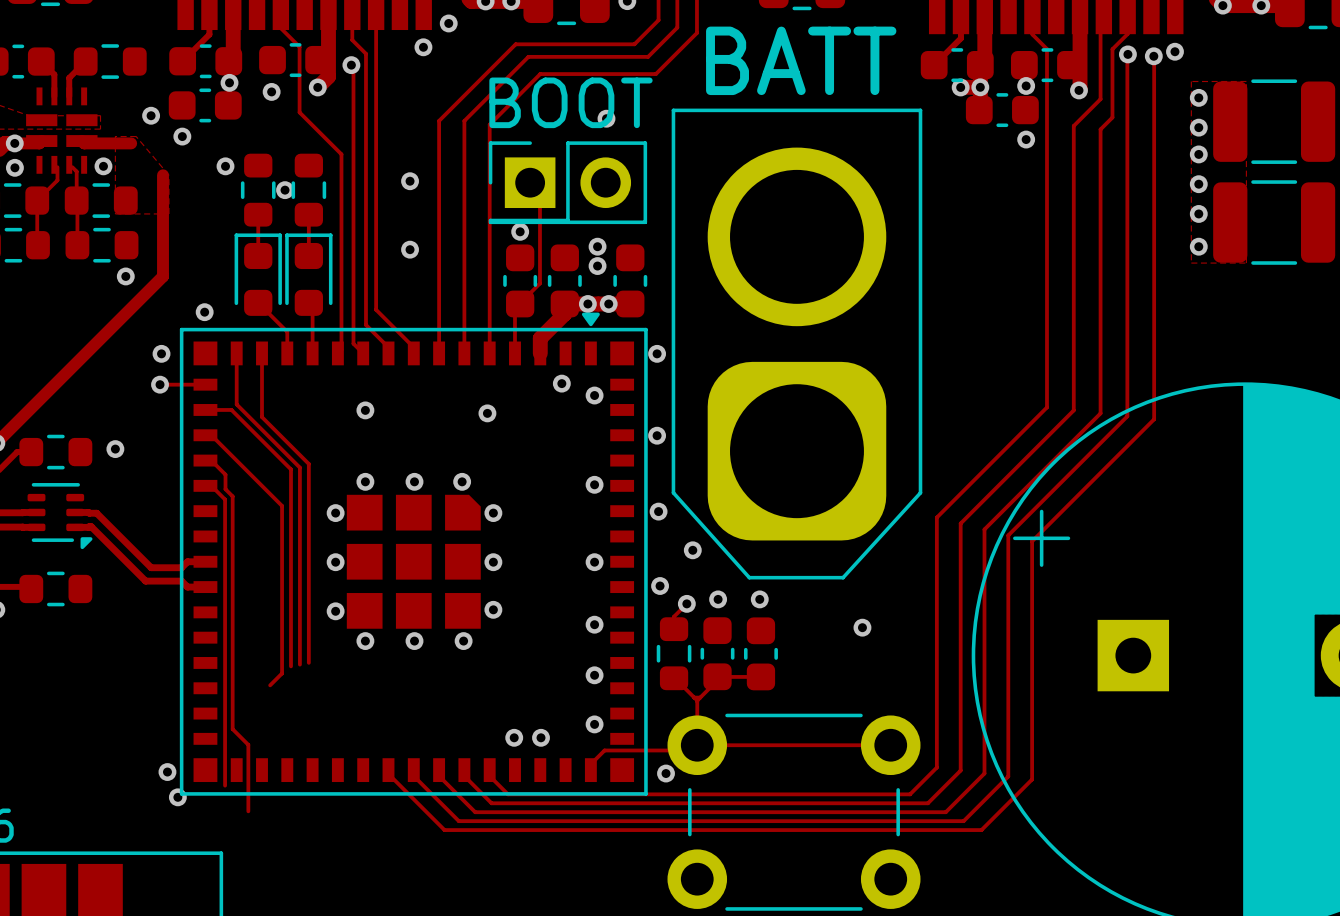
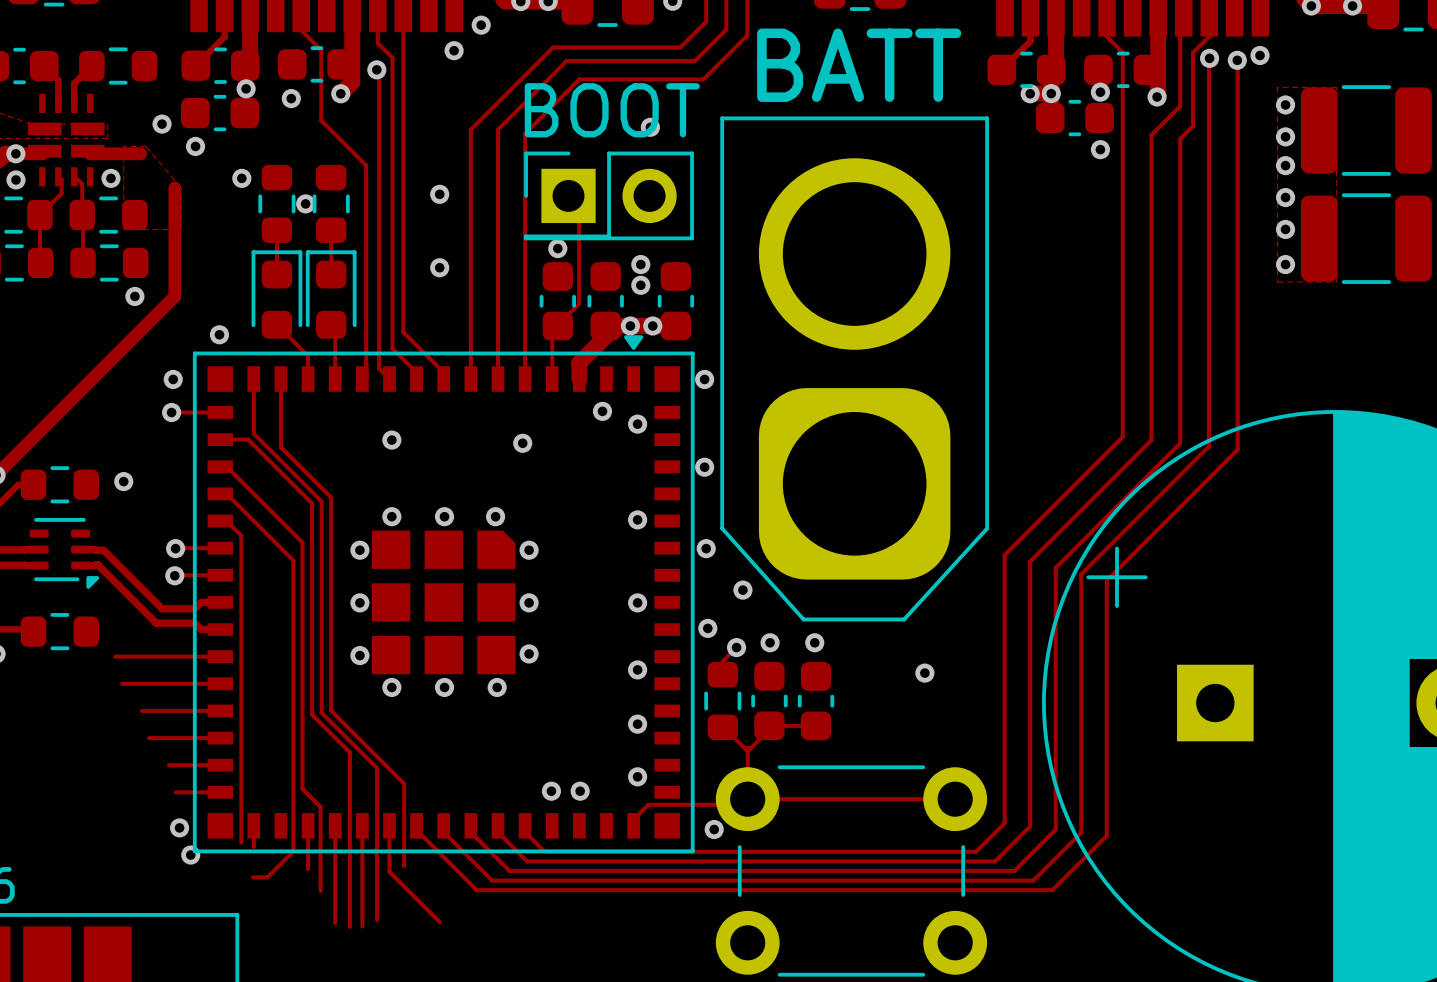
track: (225, 474) (225, 489) (232, 496) (232, 729) (248, 744) (248, 811) -> (241, 509) (293, 560) (293, 851) (267, 877) (252, 877)
via: none -> (175, 548)
track: none -> (220, 548) (175, 548)
via: none -> (174, 575)
track: none -> (220, 575) (174, 575)
track: none -> (115, 656) (220, 656)
track: none -> (122, 683) (220, 683)
track: none -> (142, 710) (220, 710)
track: none -> (331, 710) (404, 783) (404, 866)
track: none -> (321, 712) (377, 768) (377, 920)
track: none -> (312, 714) (349, 752) (349, 926)
track: (282, 673) (270, 685) -> (302, 722) (302, 788) (320, 807) (320, 890)
track: none -> (149, 738) (220, 738)
track: none -> (168, 765) (220, 765)
track: none -> (175, 792) (220, 792)
track: none -> (253, 825) (253, 847)
track: none -> (308, 825) (308, 869)
track: none -> (335, 825) (335, 923)
track: none -> (362, 825) (362, 926)
track: none -> (389, 825) (389, 871) (439, 922)

